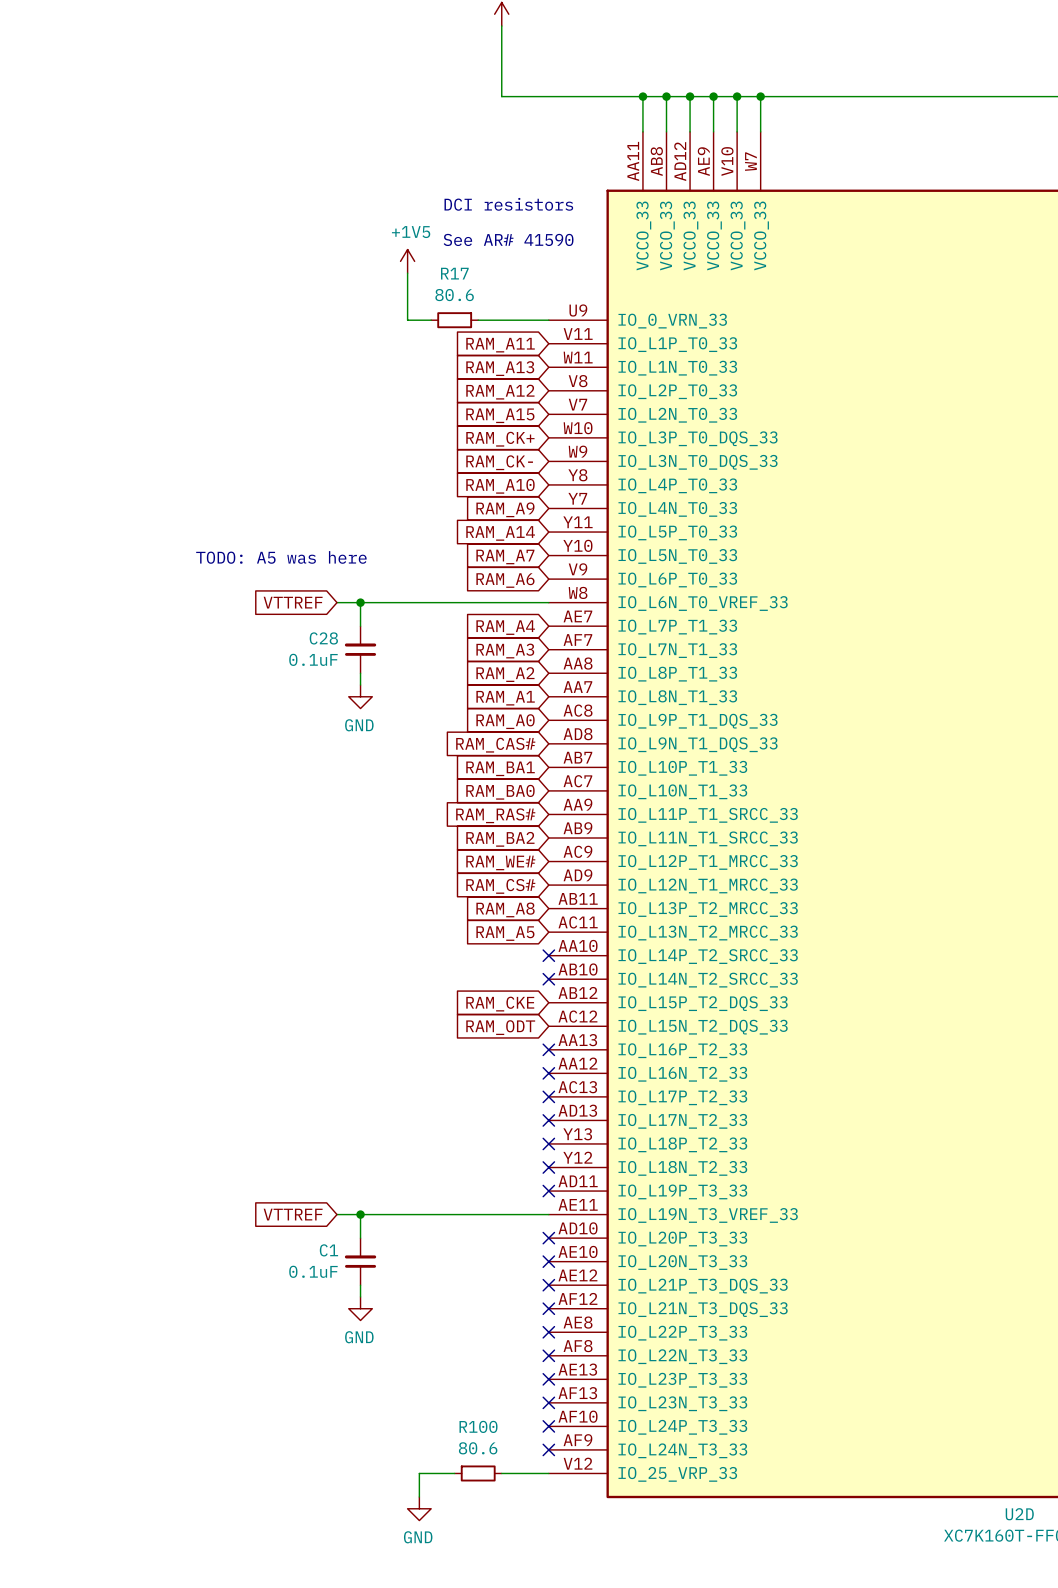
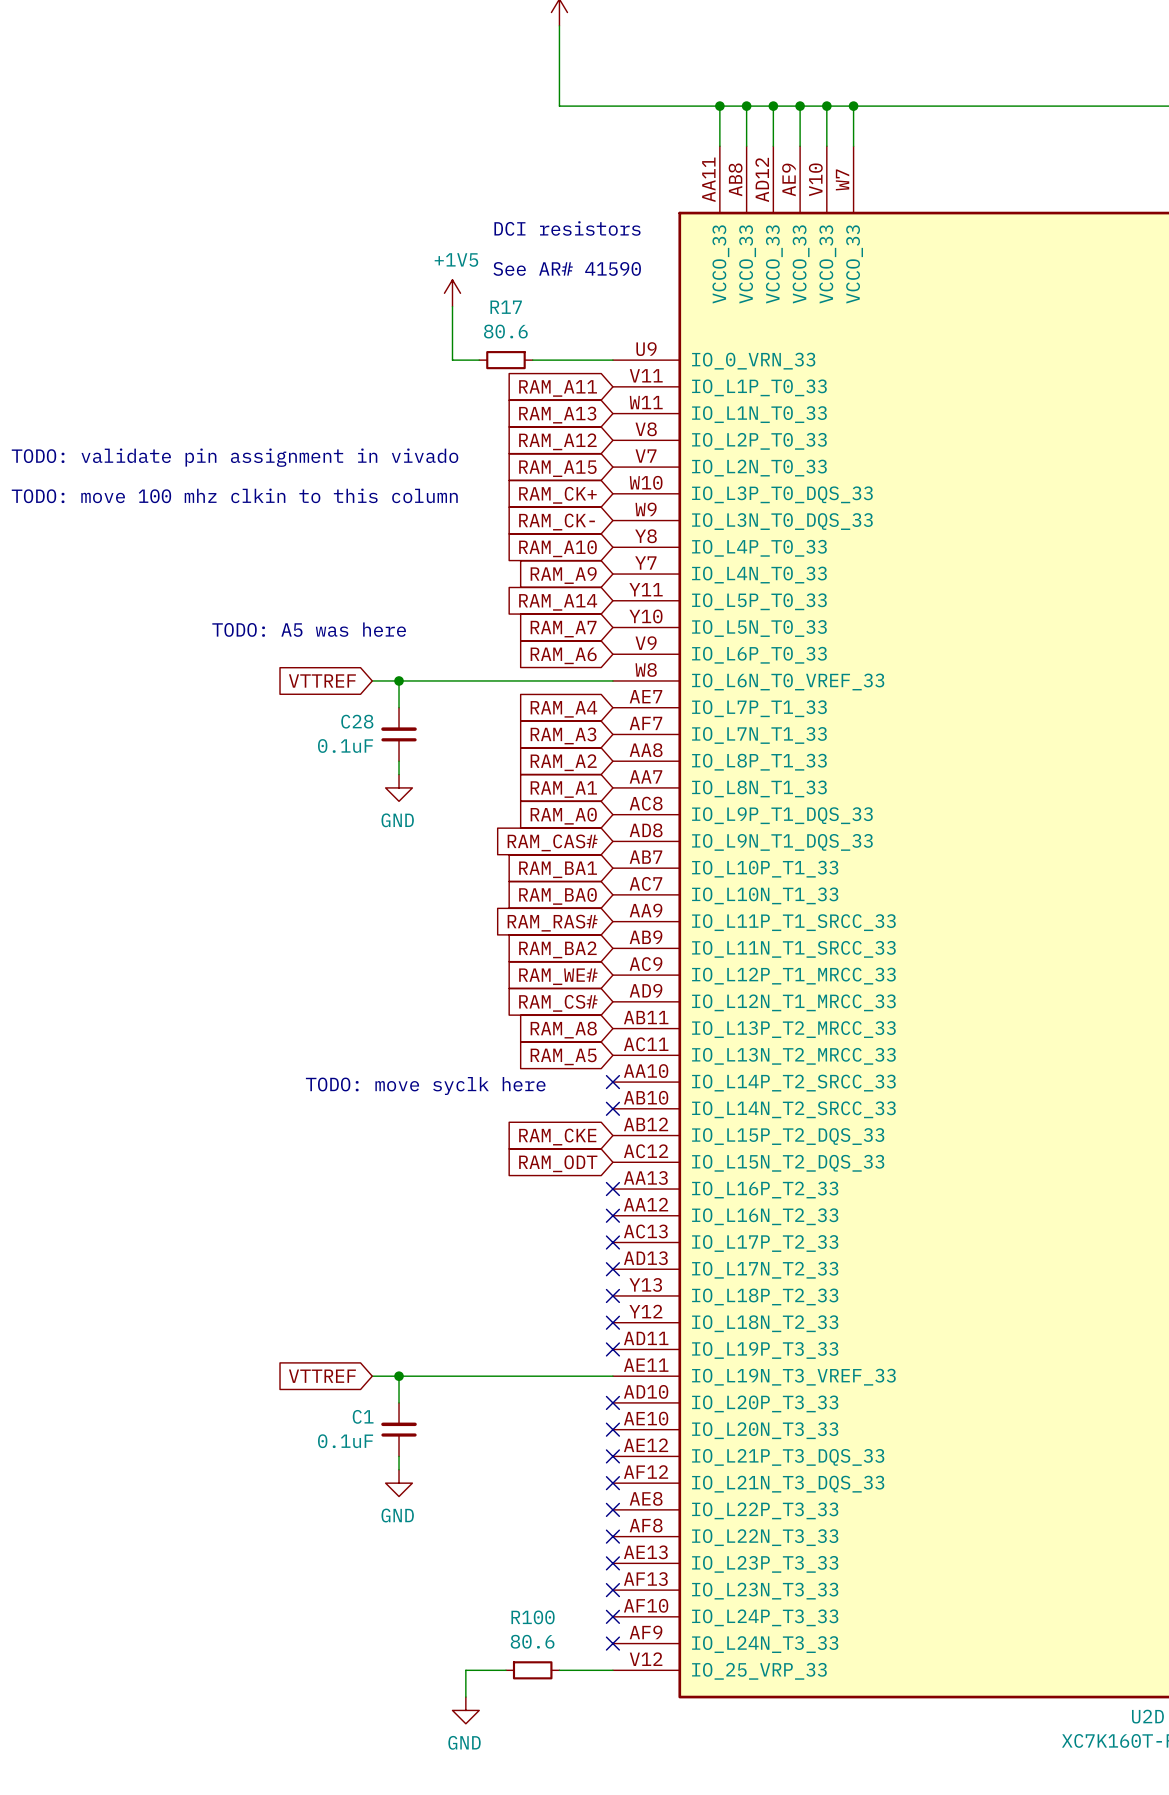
text: none -> TODO: validate pin assignment in vivado (235, 457)
text: none -> TODO: move 100 mhz clkin to this column (234, 495)
text: none -> TODO: move syclk here (425, 1085)

